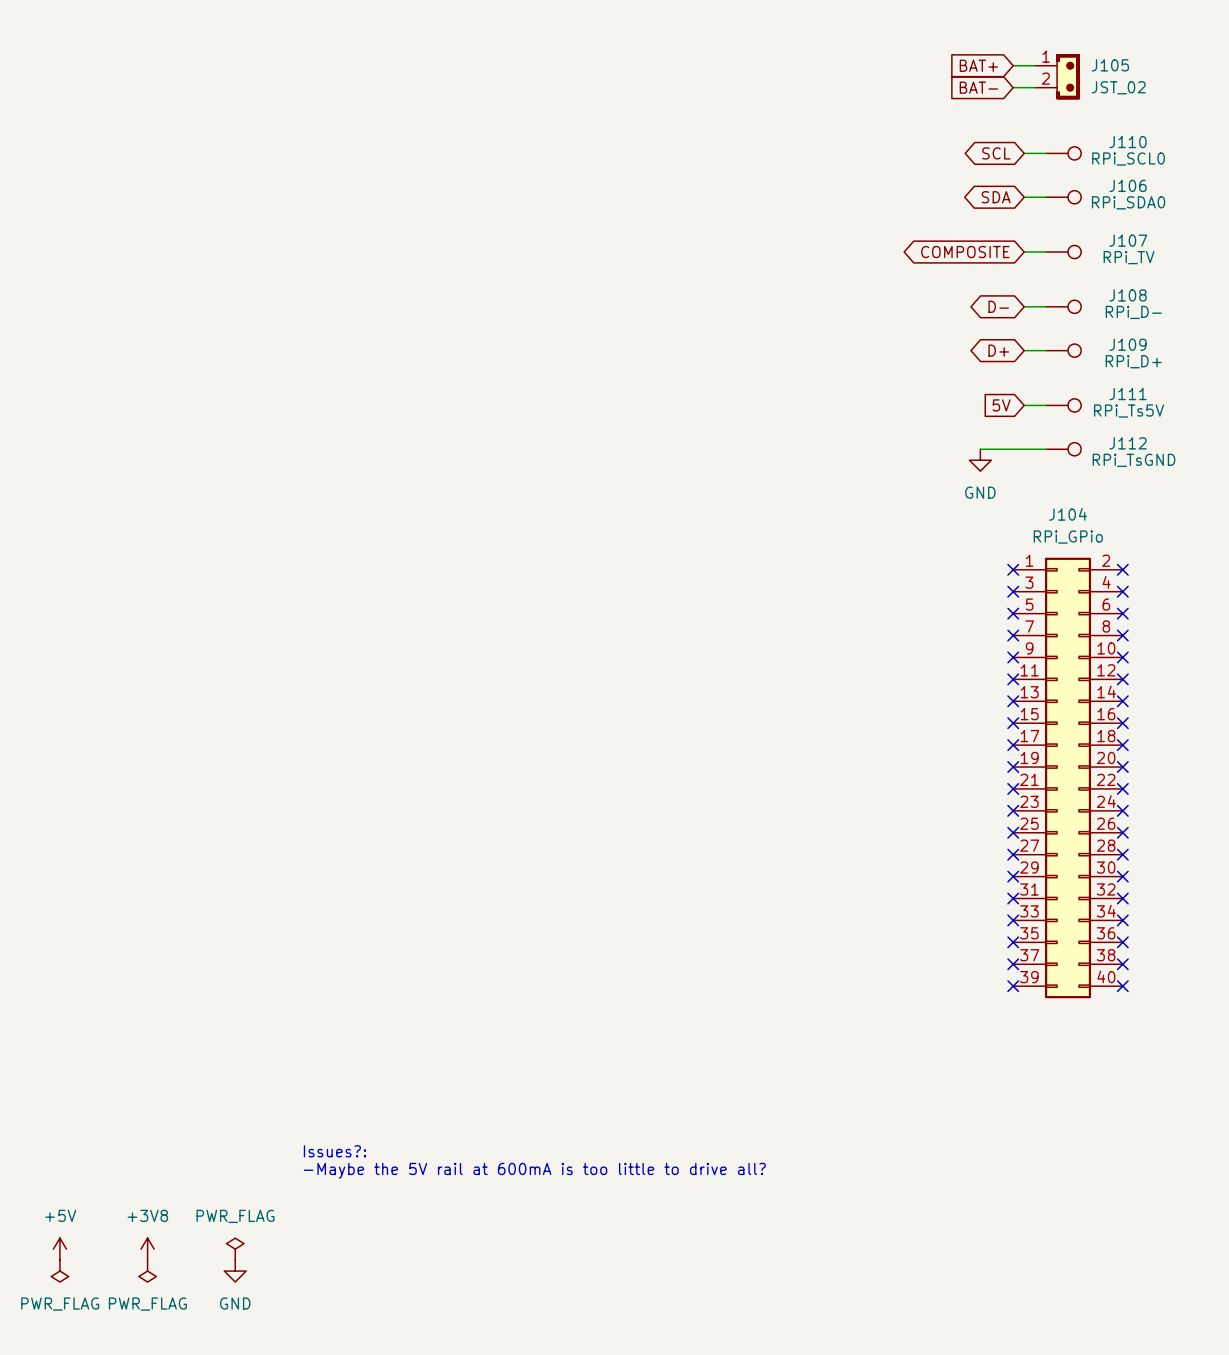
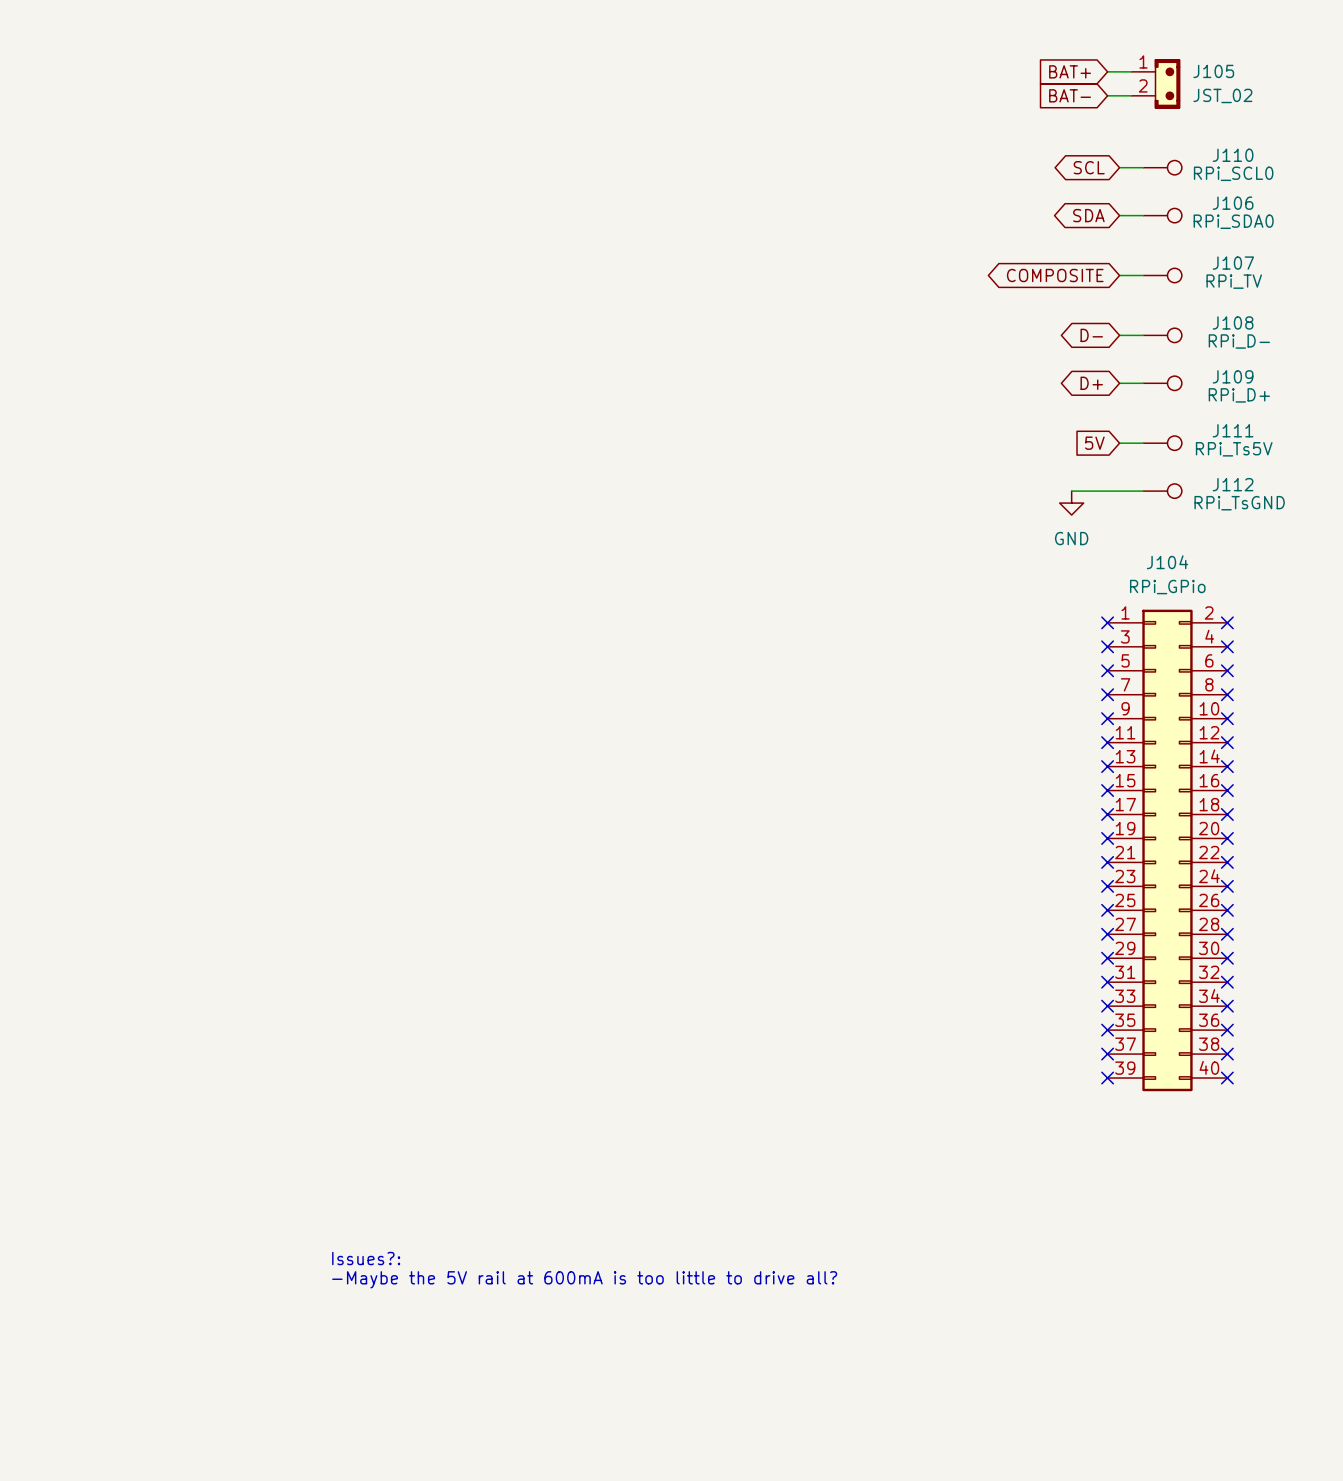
power symbol: +5V (59, 1249) -> none
power symbol: +3V8 (147, 1249) -> none
power symbol: PWR_FLAG (235, 1249) -> none
power symbol: PWR_FLAG (59, 1271) -> none
power symbol: PWR_FLAG (147, 1271) -> none
power symbol: GND (235, 1271) -> none

